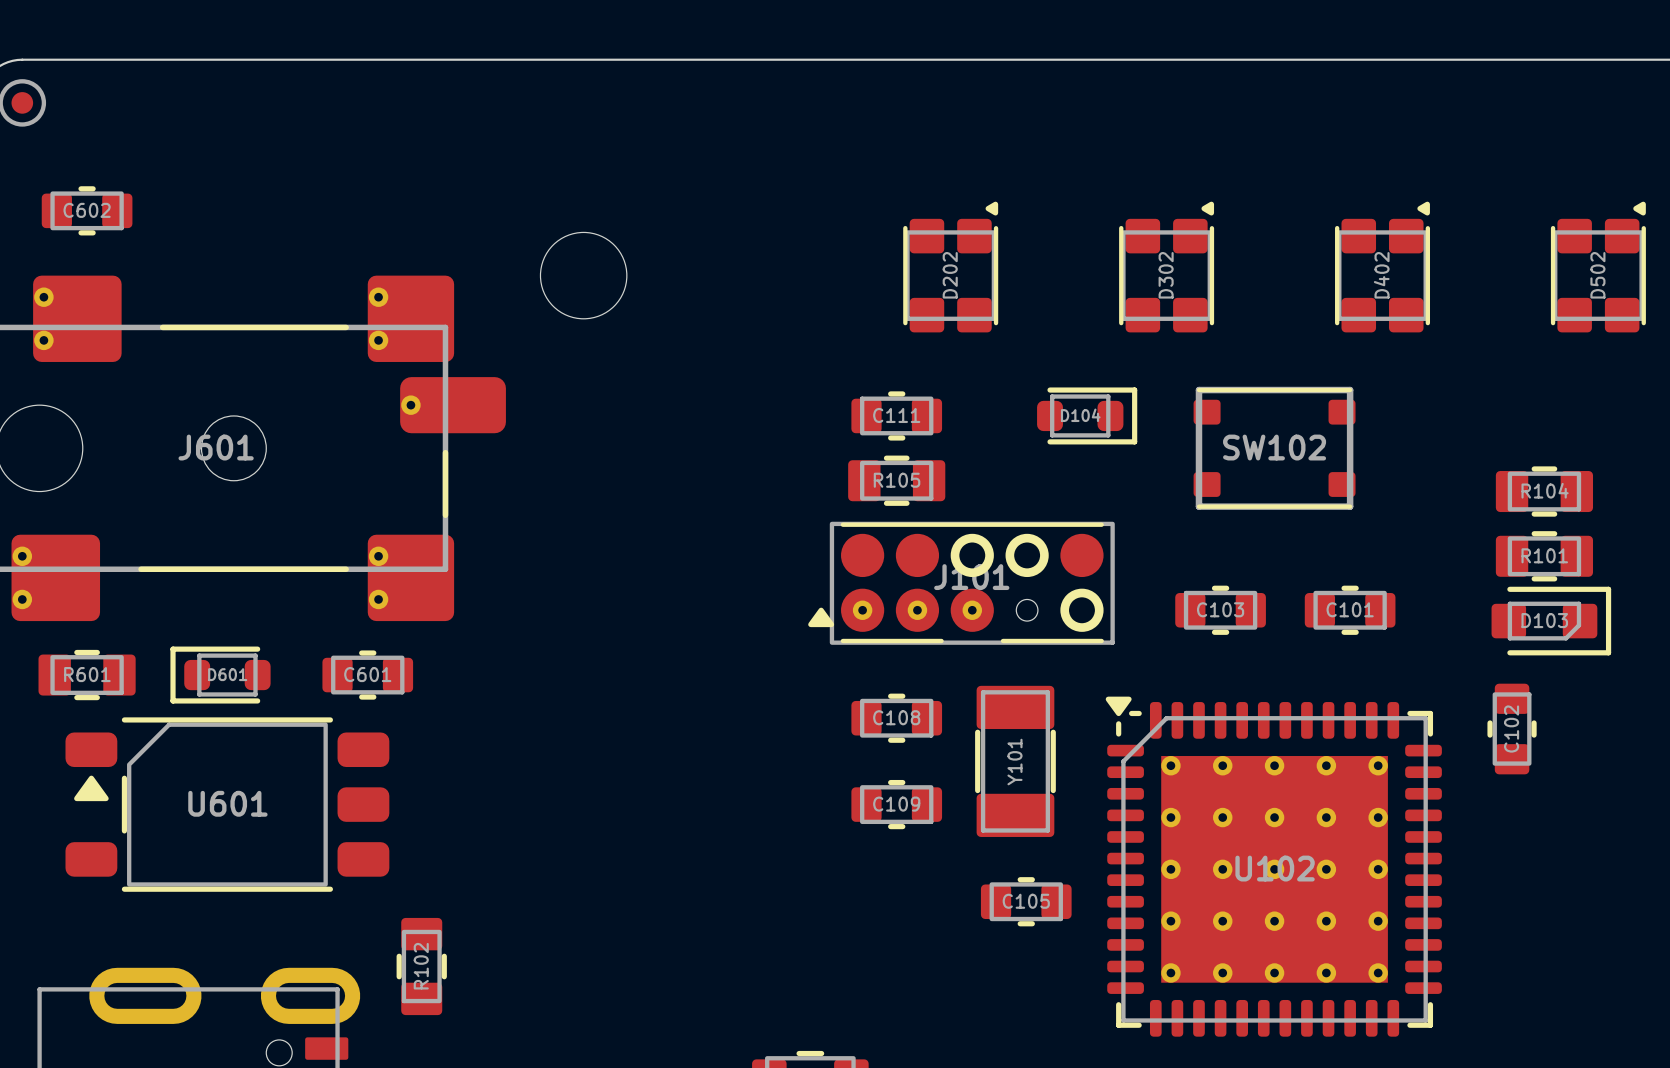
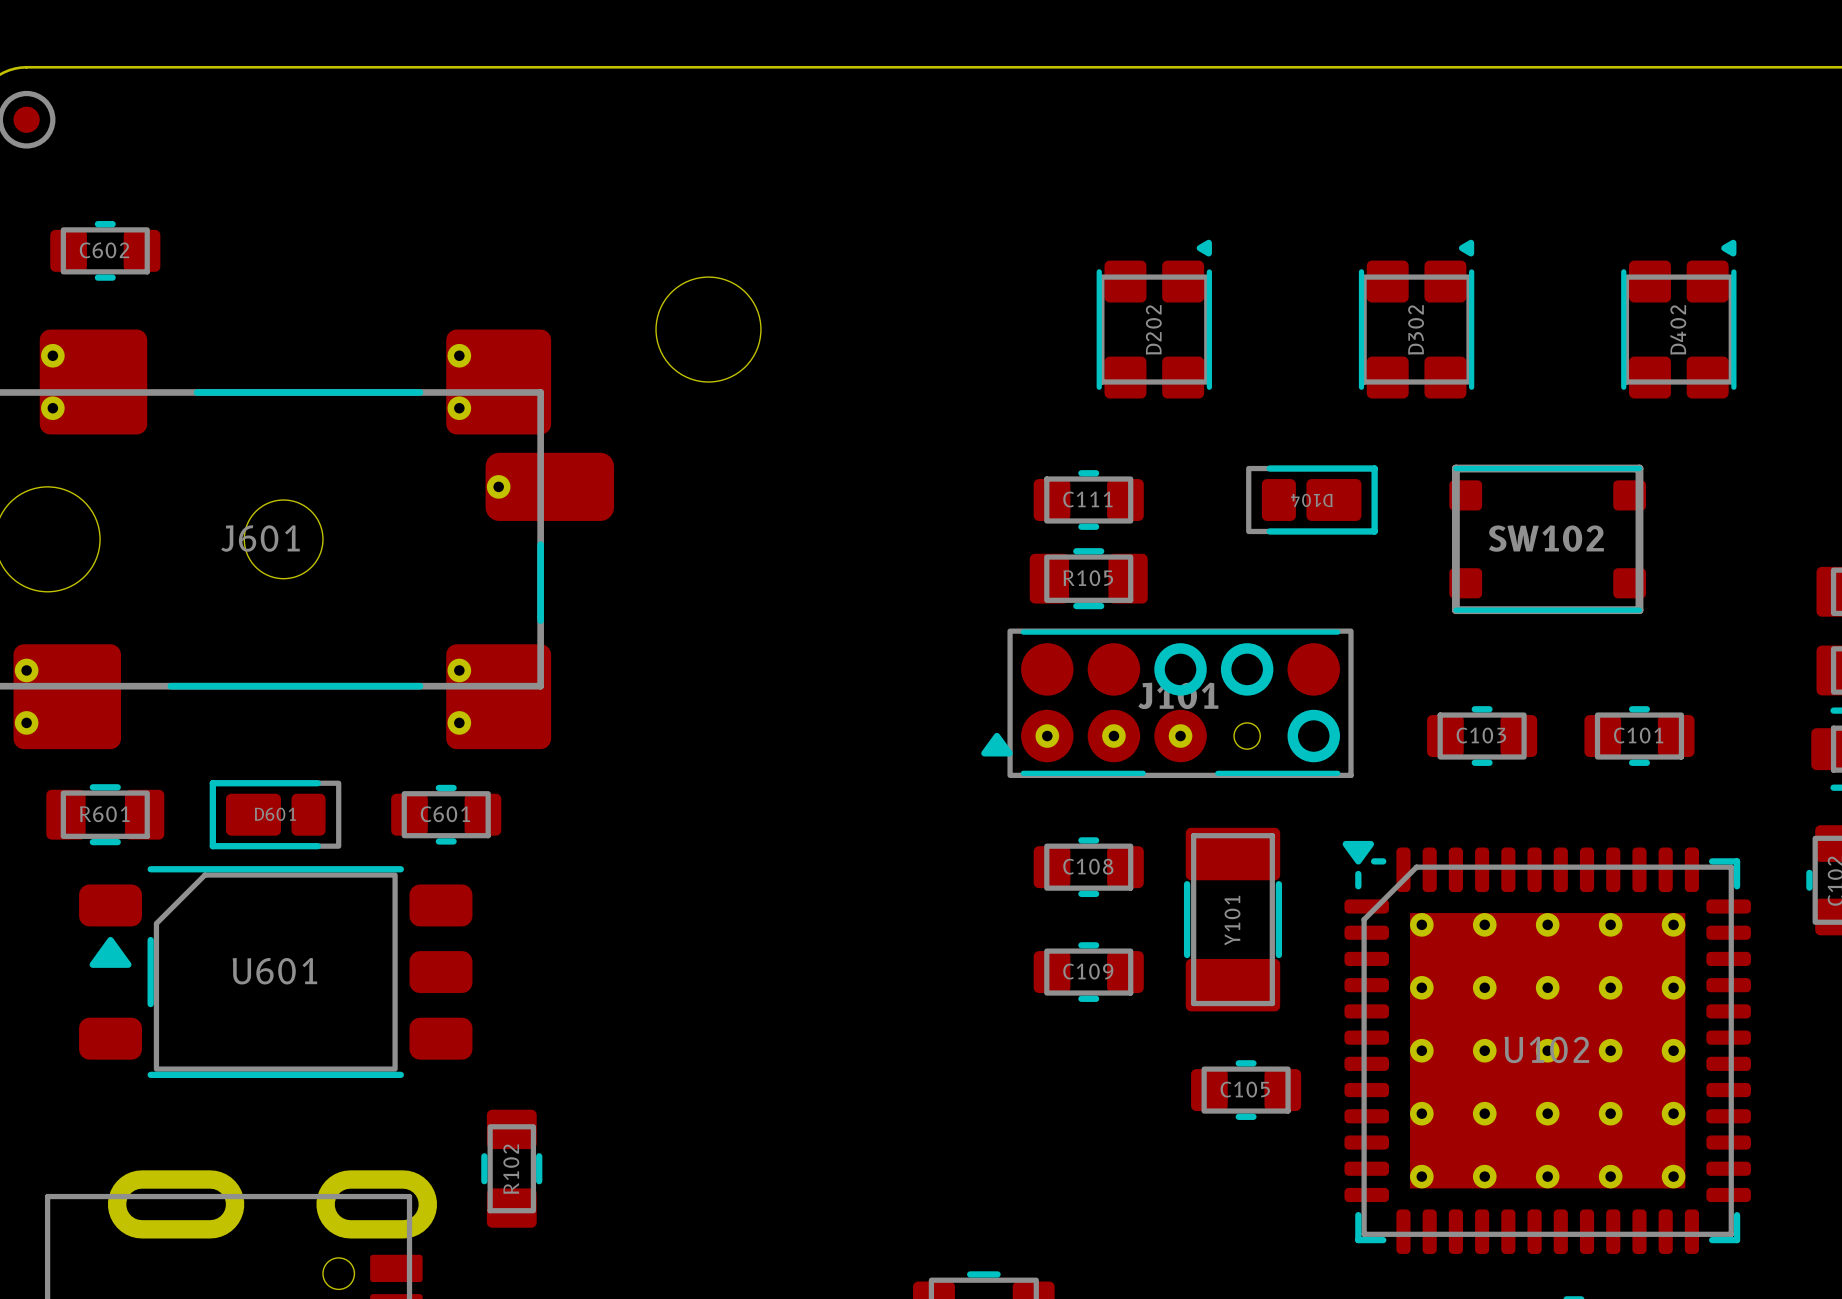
D104 footprint: [1037, 387, 1138, 445] -> [1246, 465, 1378, 535]
D104 name rotation: 0° (1080, 415) -> 180° (1311, 500)
D601 footprint: [170, 646, 271, 704] -> [209, 780, 342, 850]

